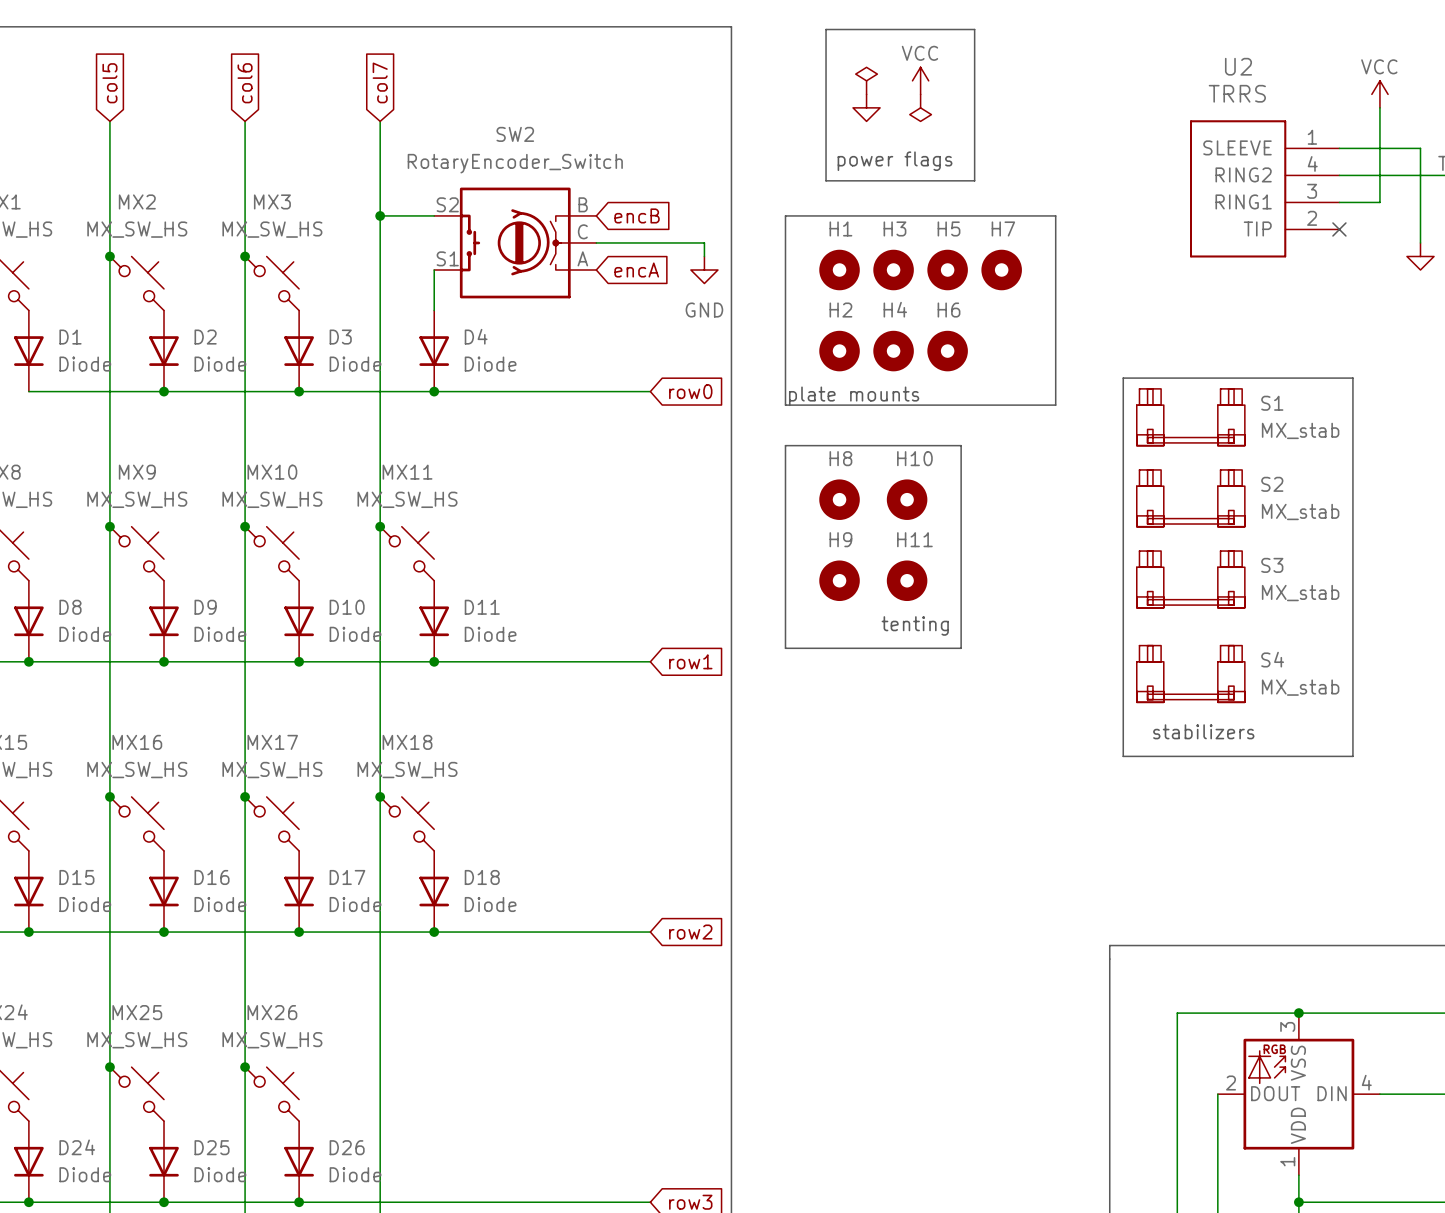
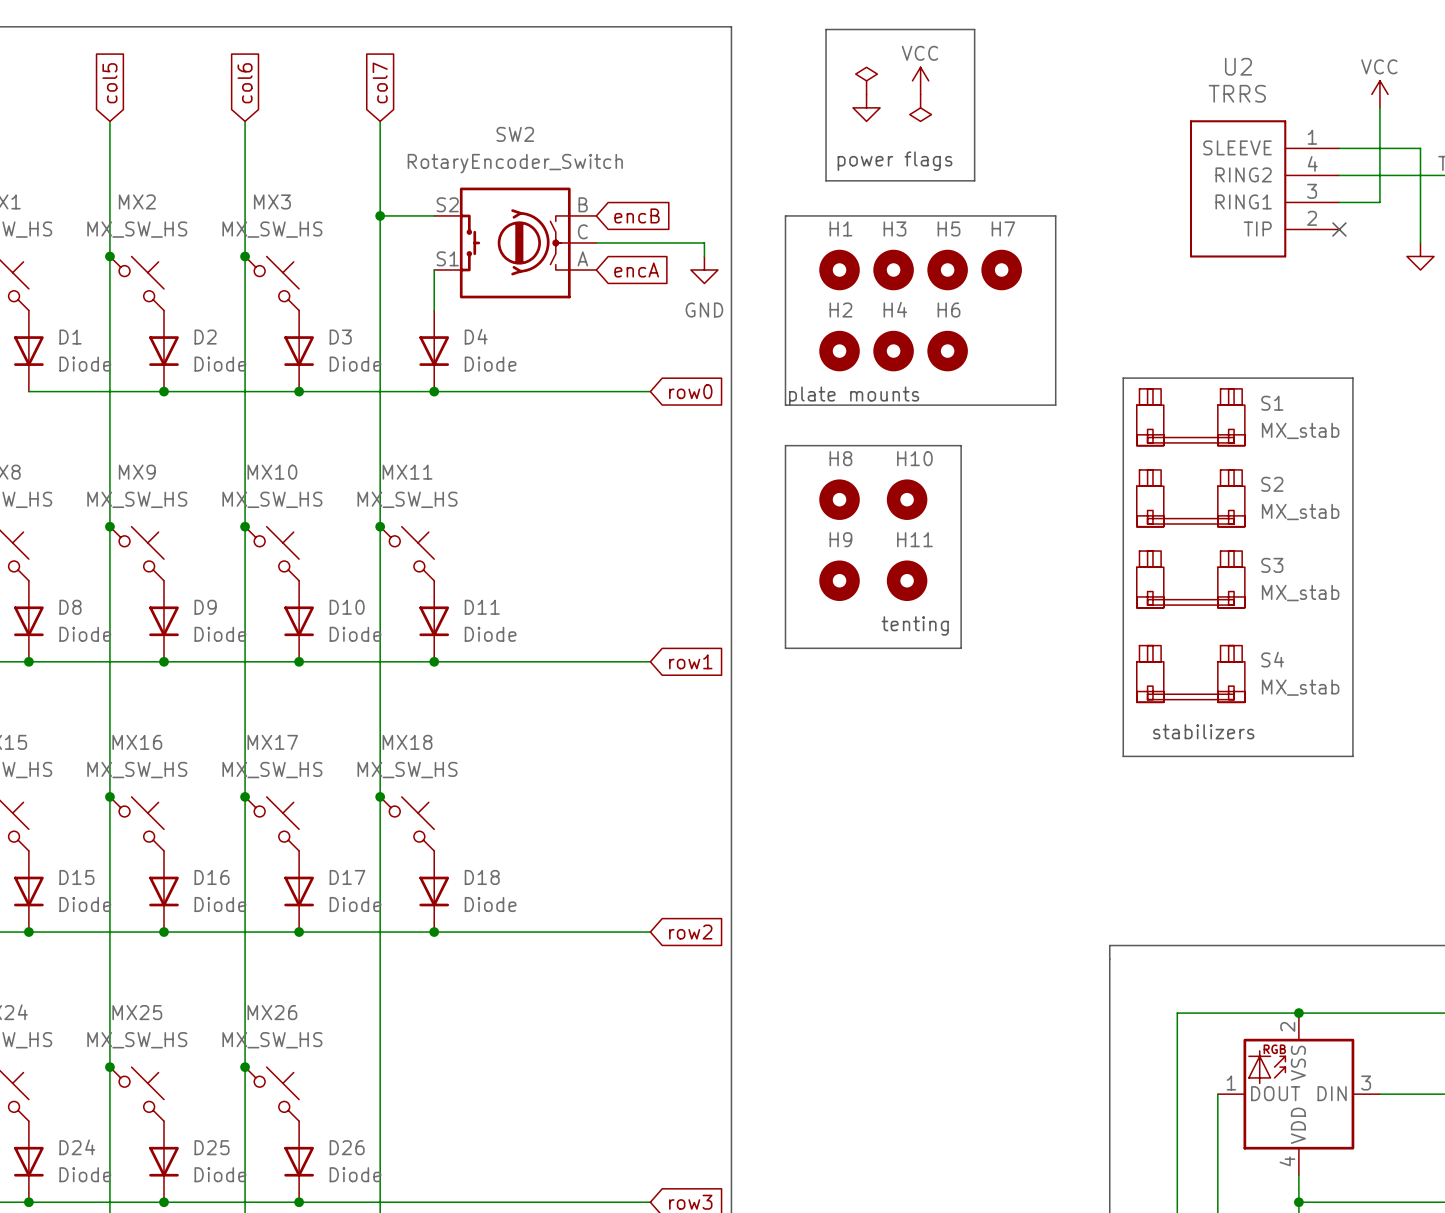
part pin number: 3 (1287, 1026) -> 2 (1287, 1026)
part pin number: 4 (1366, 1082) -> 3 (1366, 1083)
part pin number: 2 (1231, 1083) -> 1 (1231, 1083)
part pin number: 1 (1287, 1161) -> 4 (1287, 1161)

